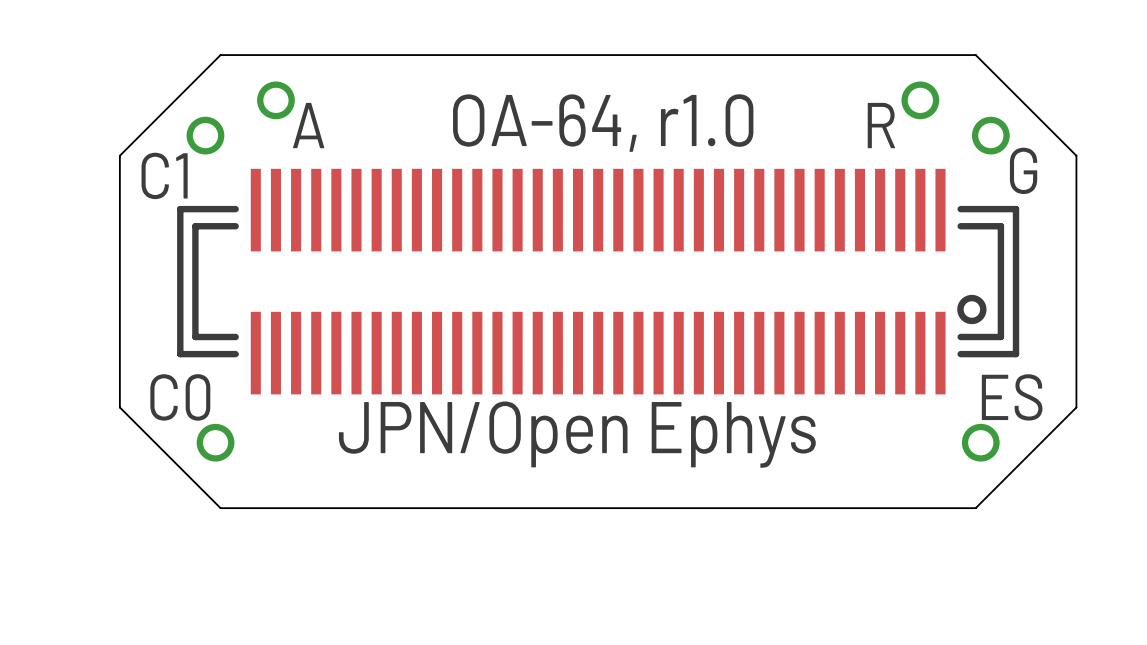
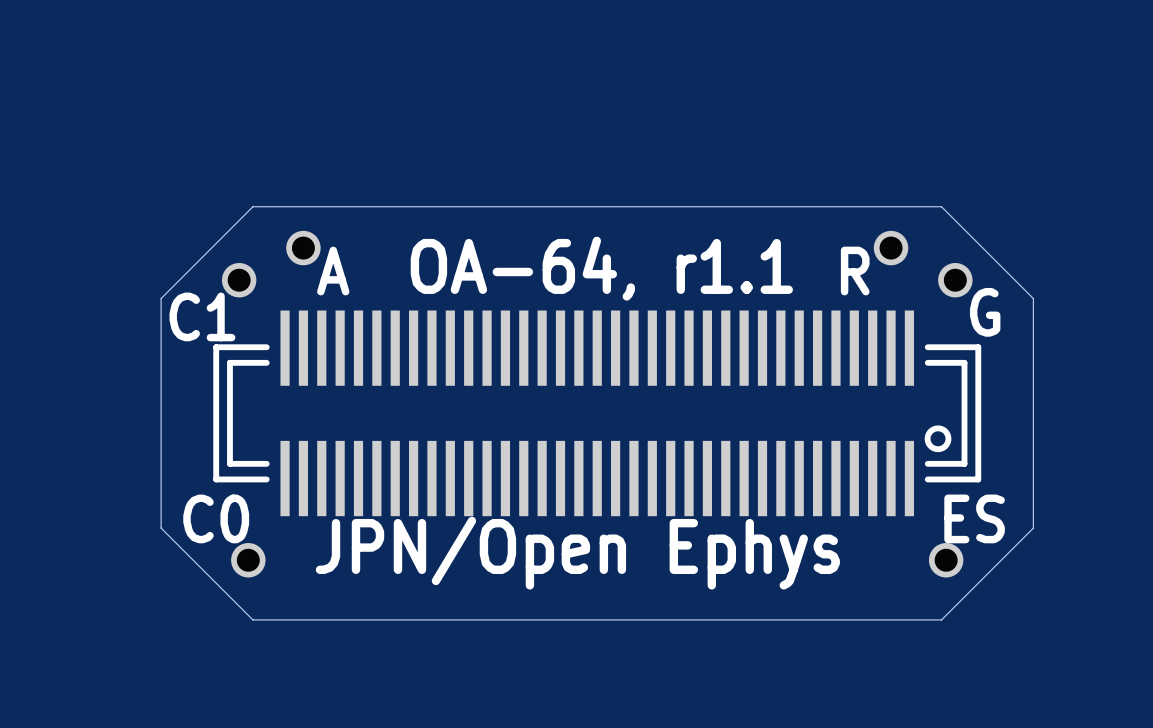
text: OA-64, r1.0 (603, 123) -> OA-64, r1.1 (601, 268)

